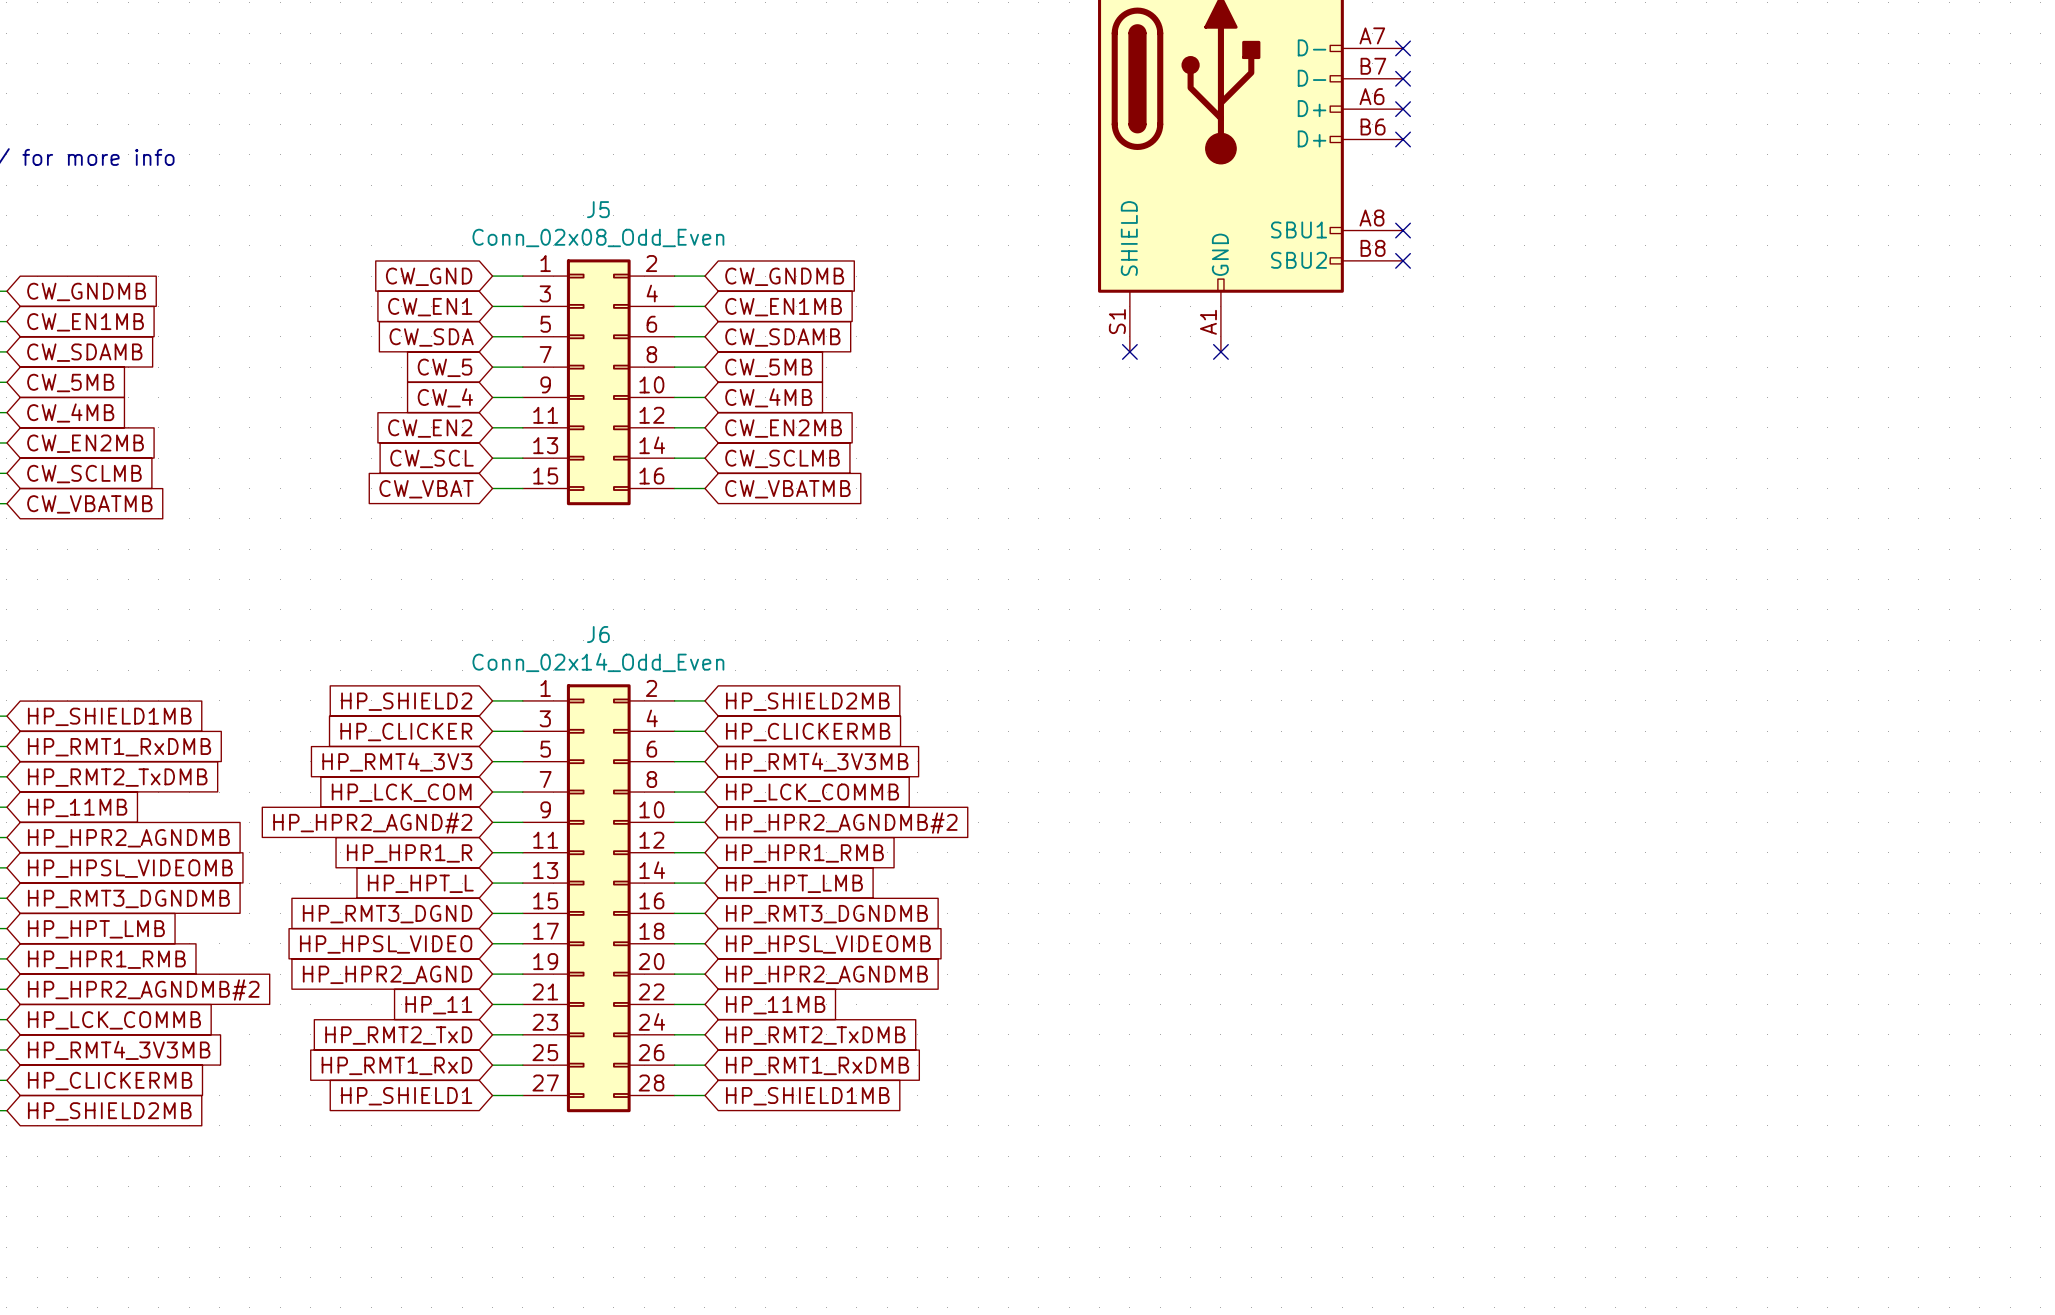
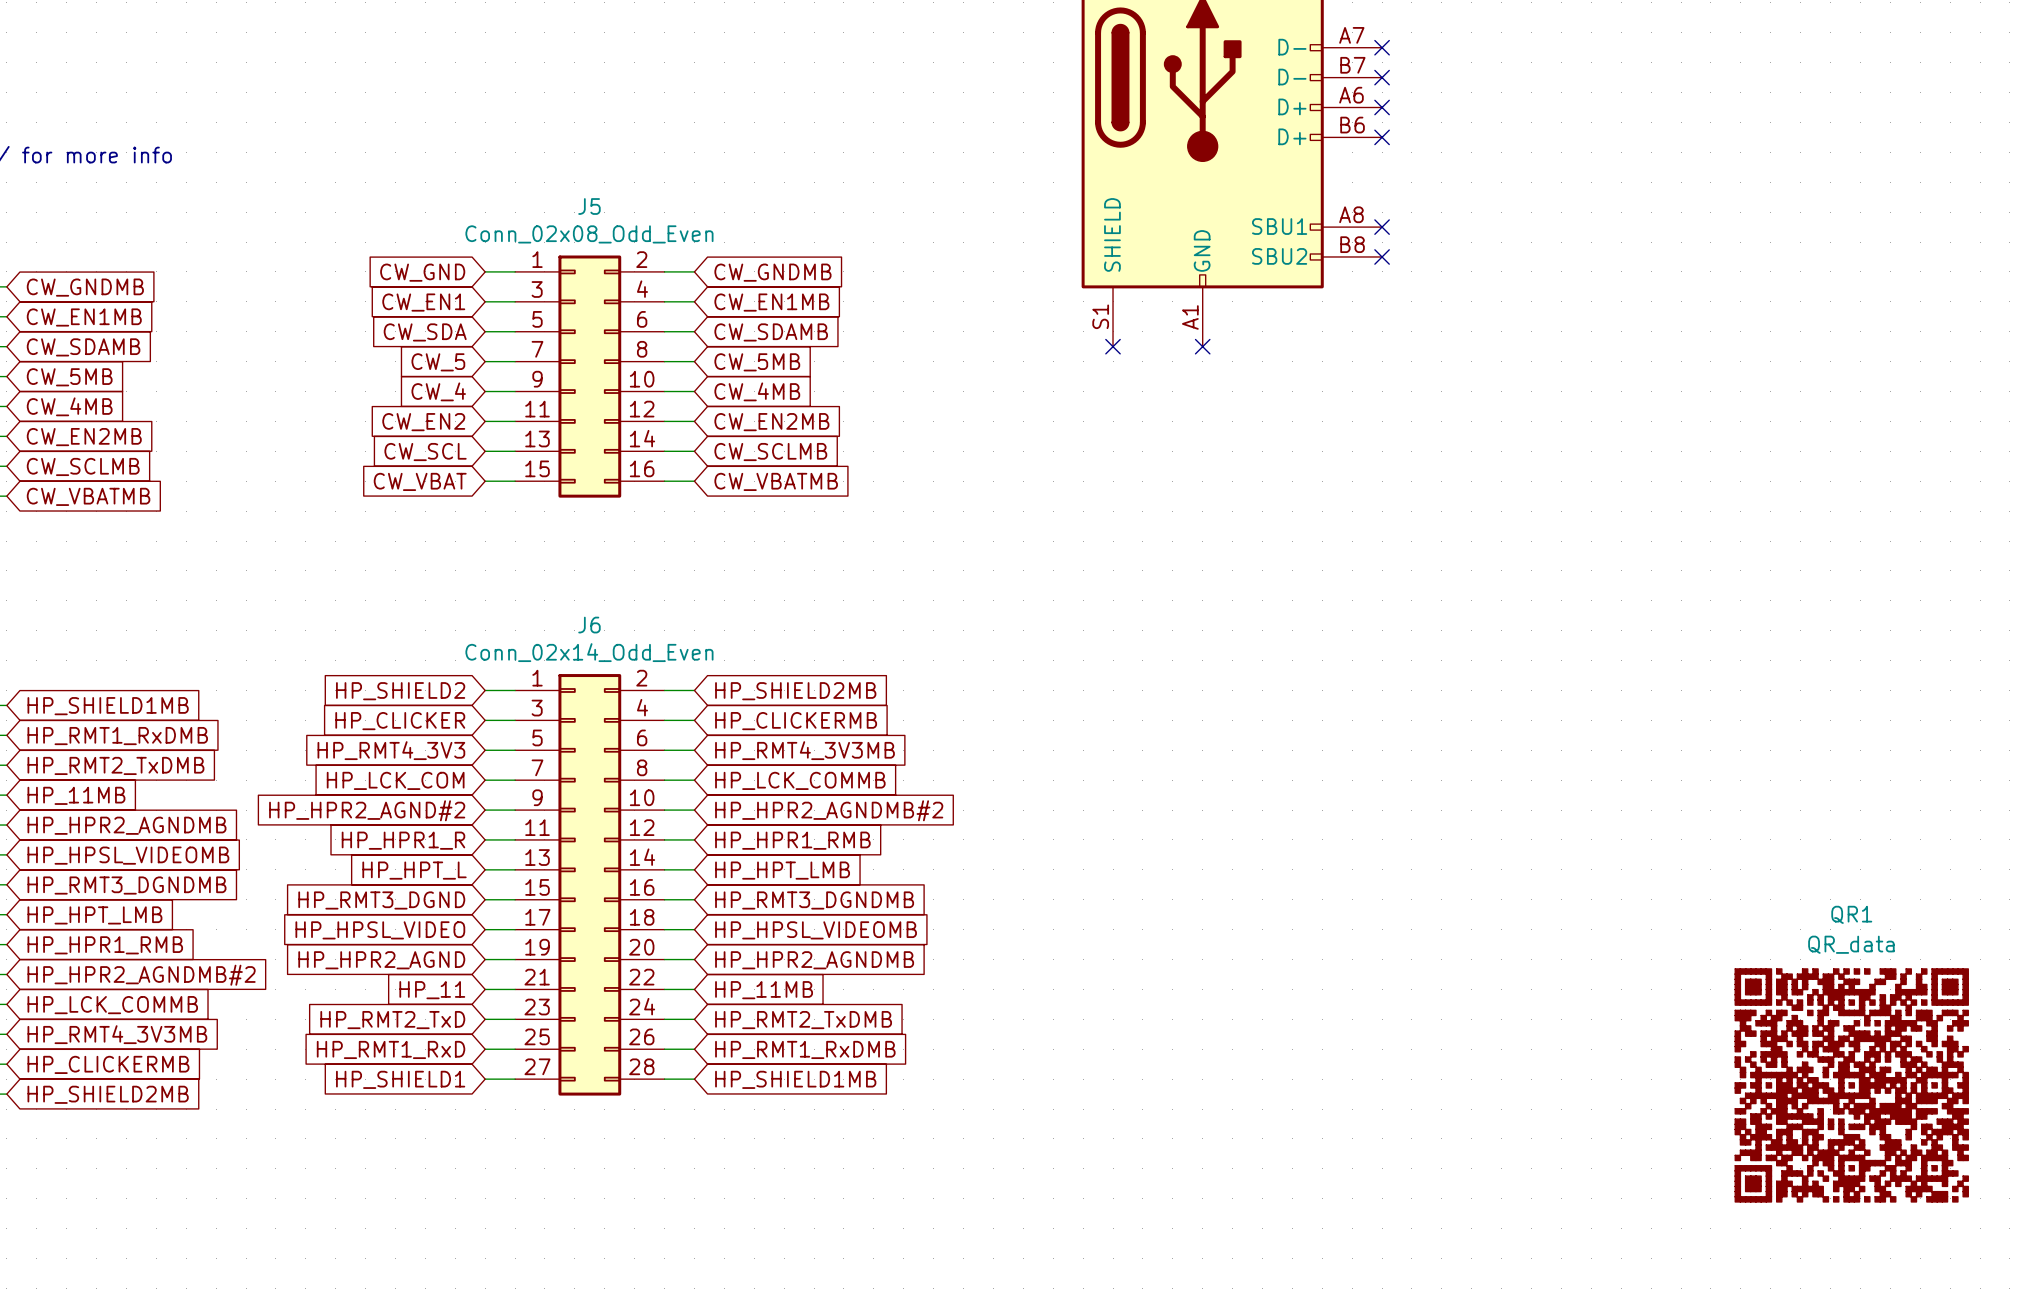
QR1: none -> QR_data (1851, 1085)

